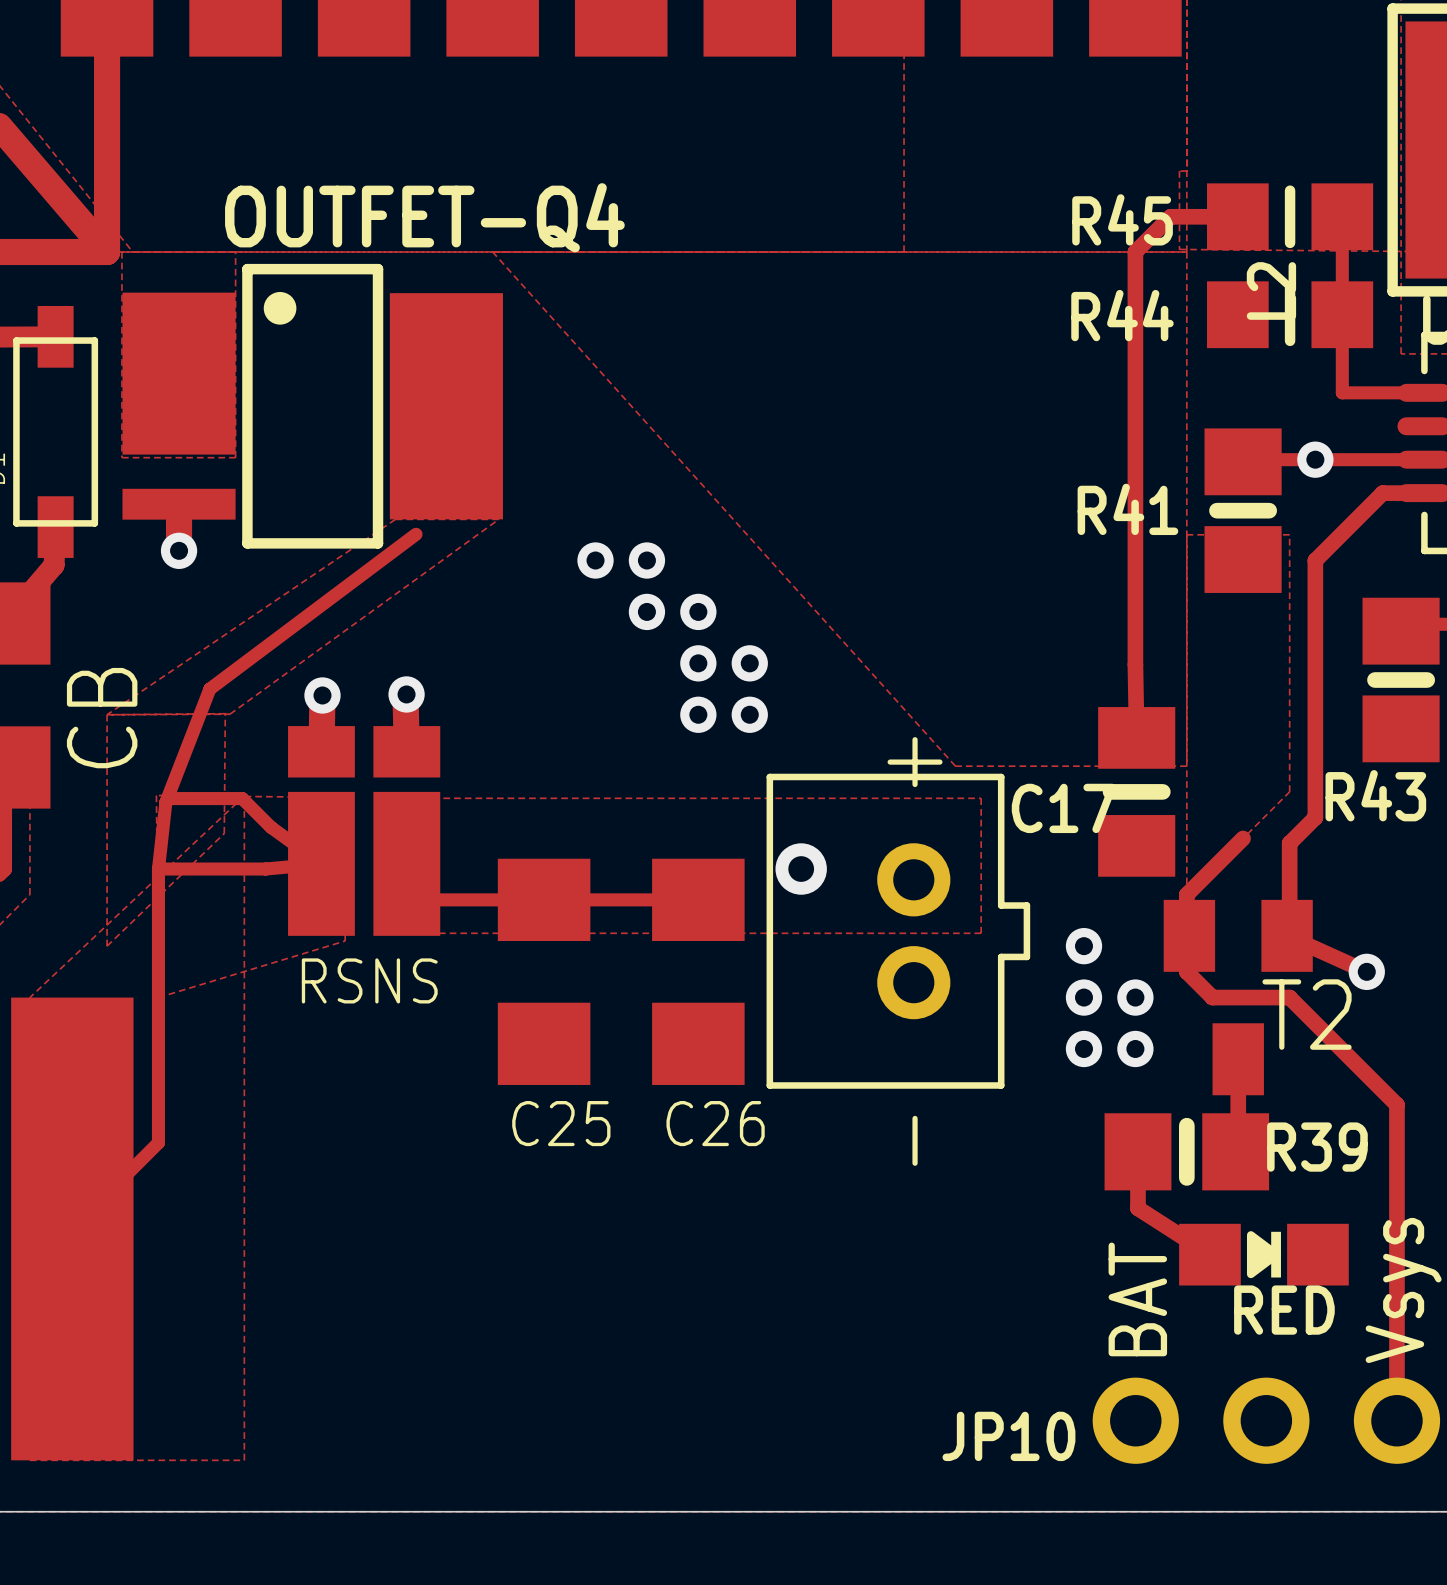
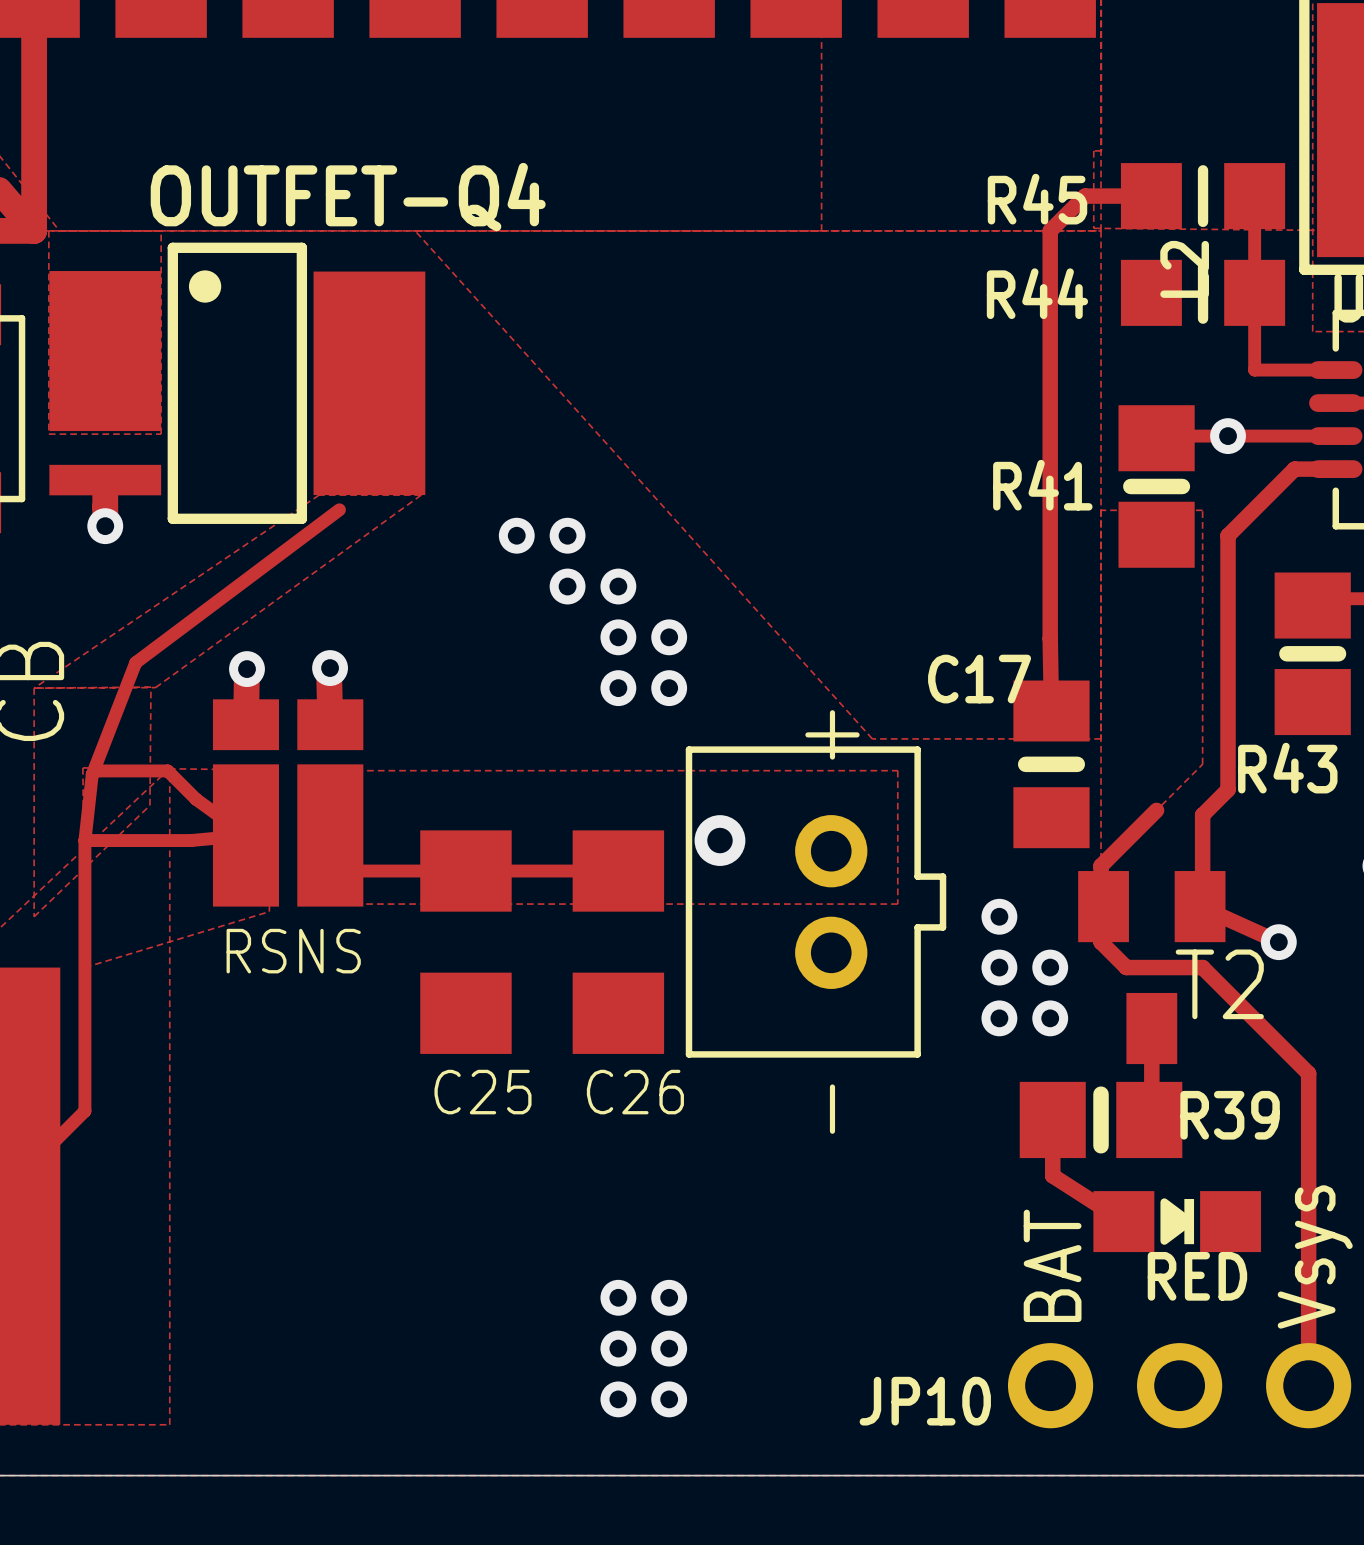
C17 name position: C17 (1063, 808) -> C17 (979, 679)
via: none -> (618, 1297)
via: none -> (669, 1297)
via: none -> (618, 1348)
via: none -> (669, 1348)
via: none -> (618, 1399)
via: none -> (669, 1399)

